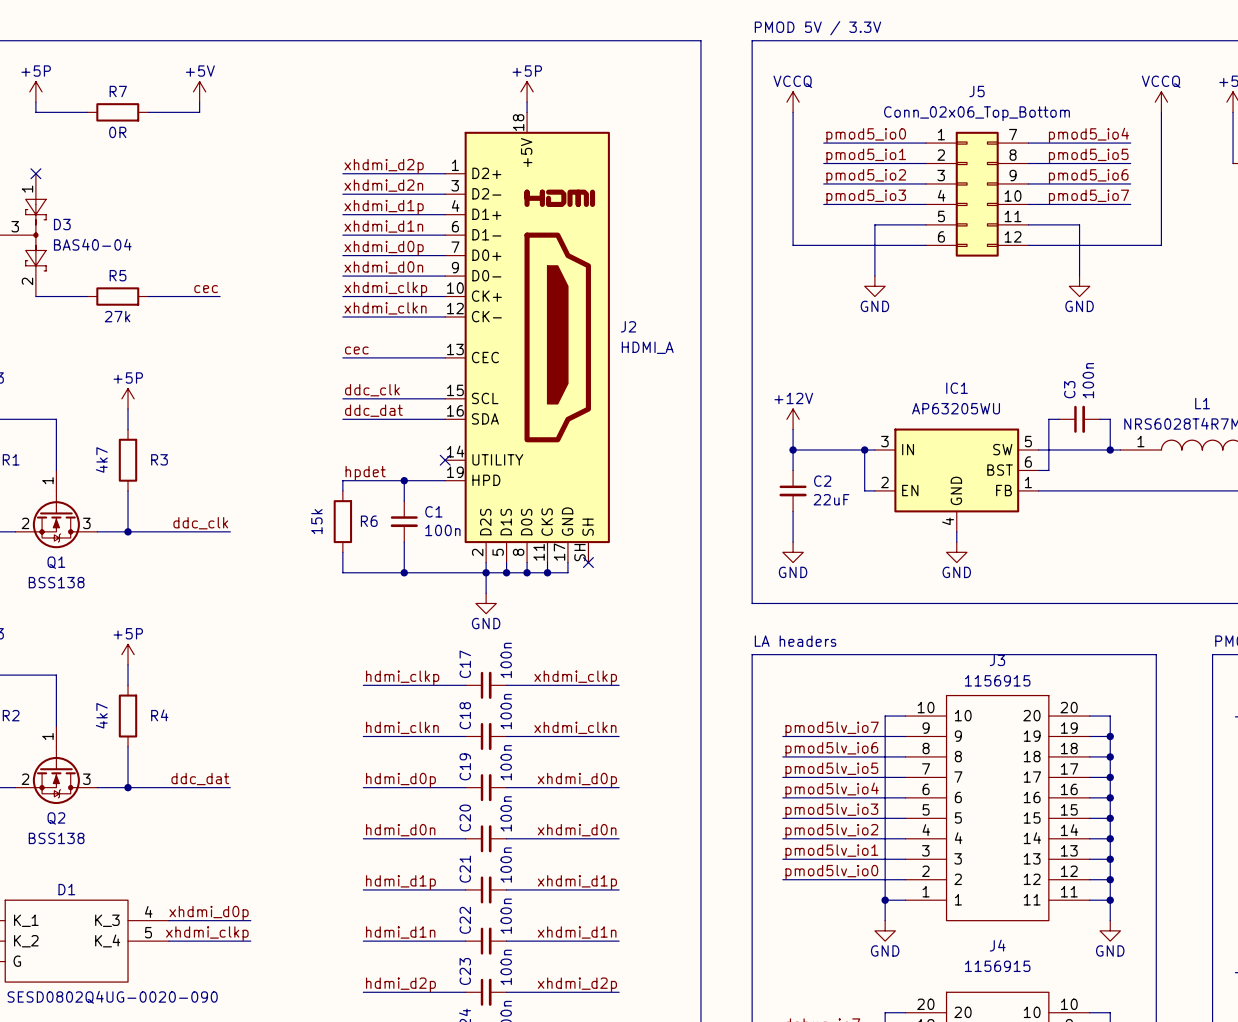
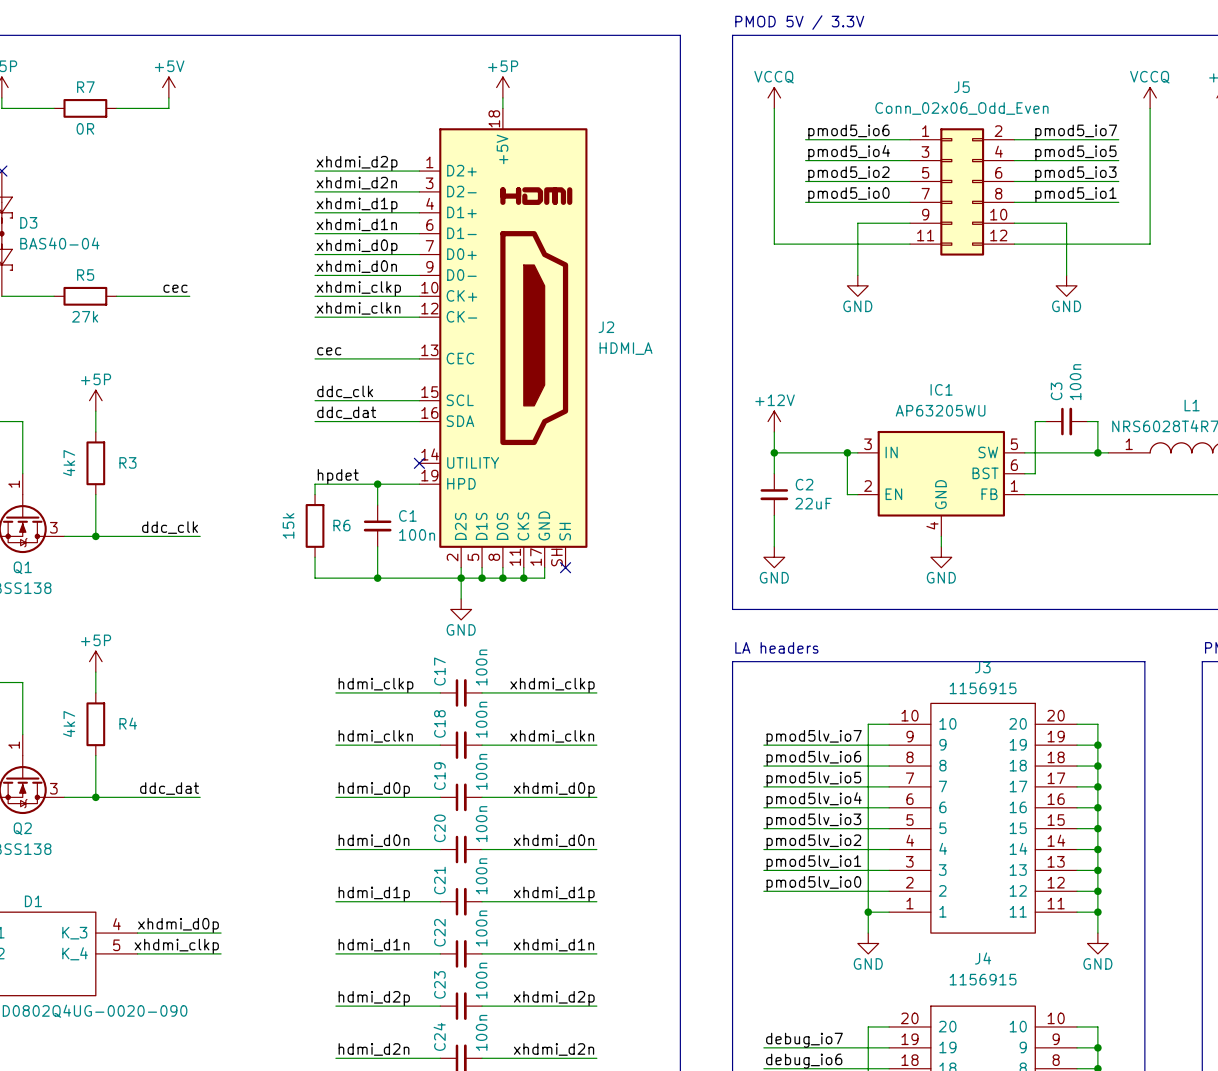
J5 value: Conn_02x06_Top_Bottom (976, 113) -> Conn_02x06_Odd_Even (961, 108)
J5 symbol: [926, 131, 1029, 257] -> [910, 128, 1015, 256]
label: pmod5_io0 (866, 135) -> pmod5_io6 (848, 132)
label: pmod5_io4 (1088, 135) -> pmod5_io7 (1076, 132)
label: pmod5_io1 (866, 156) -> pmod5_io4 (849, 152)
label: pmod5_io6 (1088, 176) -> pmod5_io3 (1075, 173)
label: pmod5_io3 (866, 197) -> pmod5_io0 (848, 194)
label: pmod5_io7 (1088, 197) -> pmod5_io1 (1075, 194)

